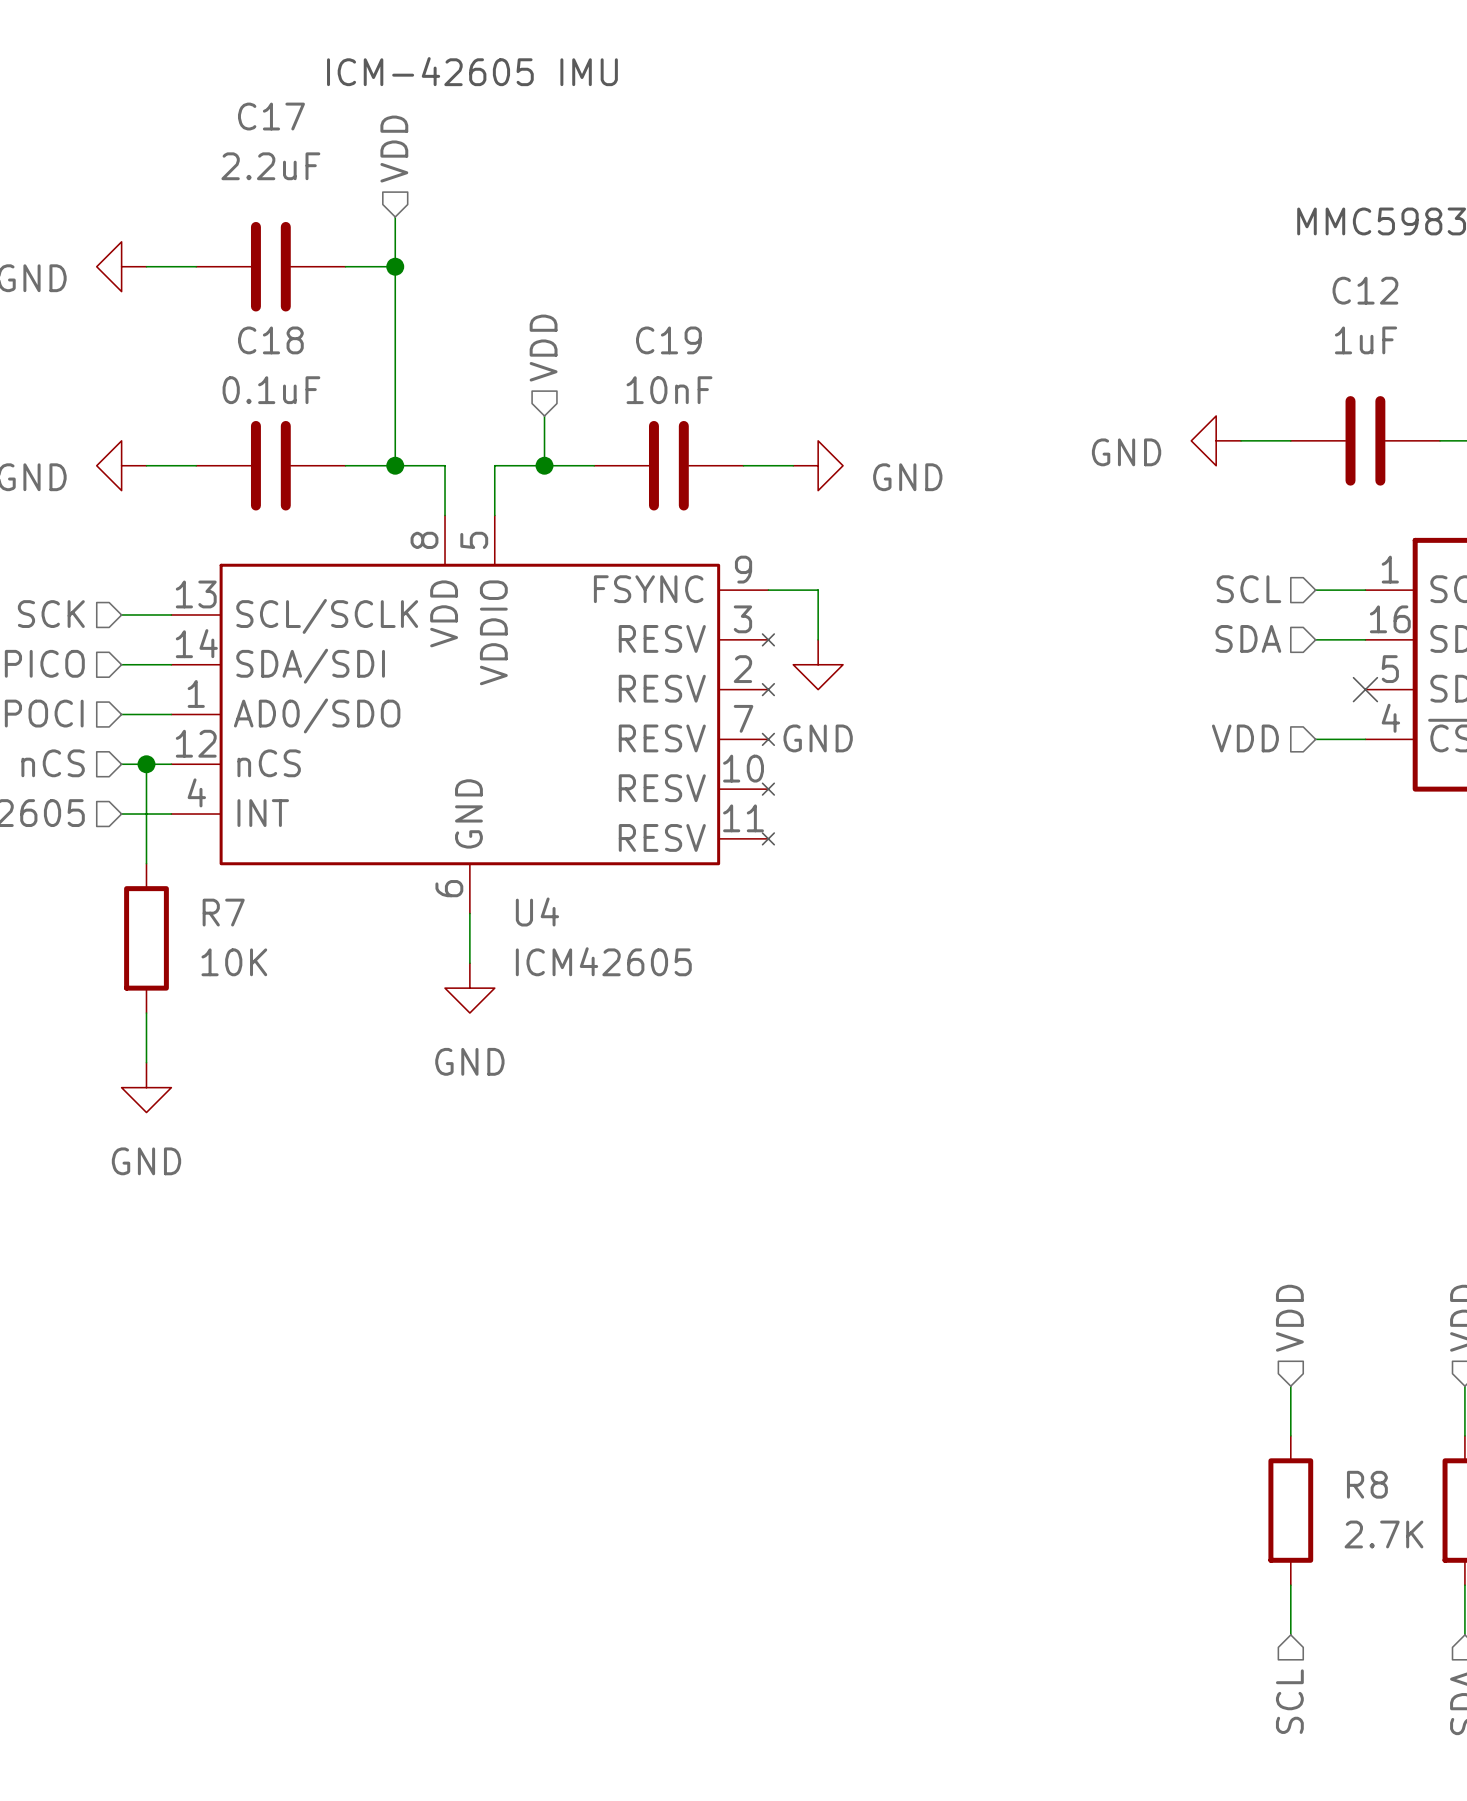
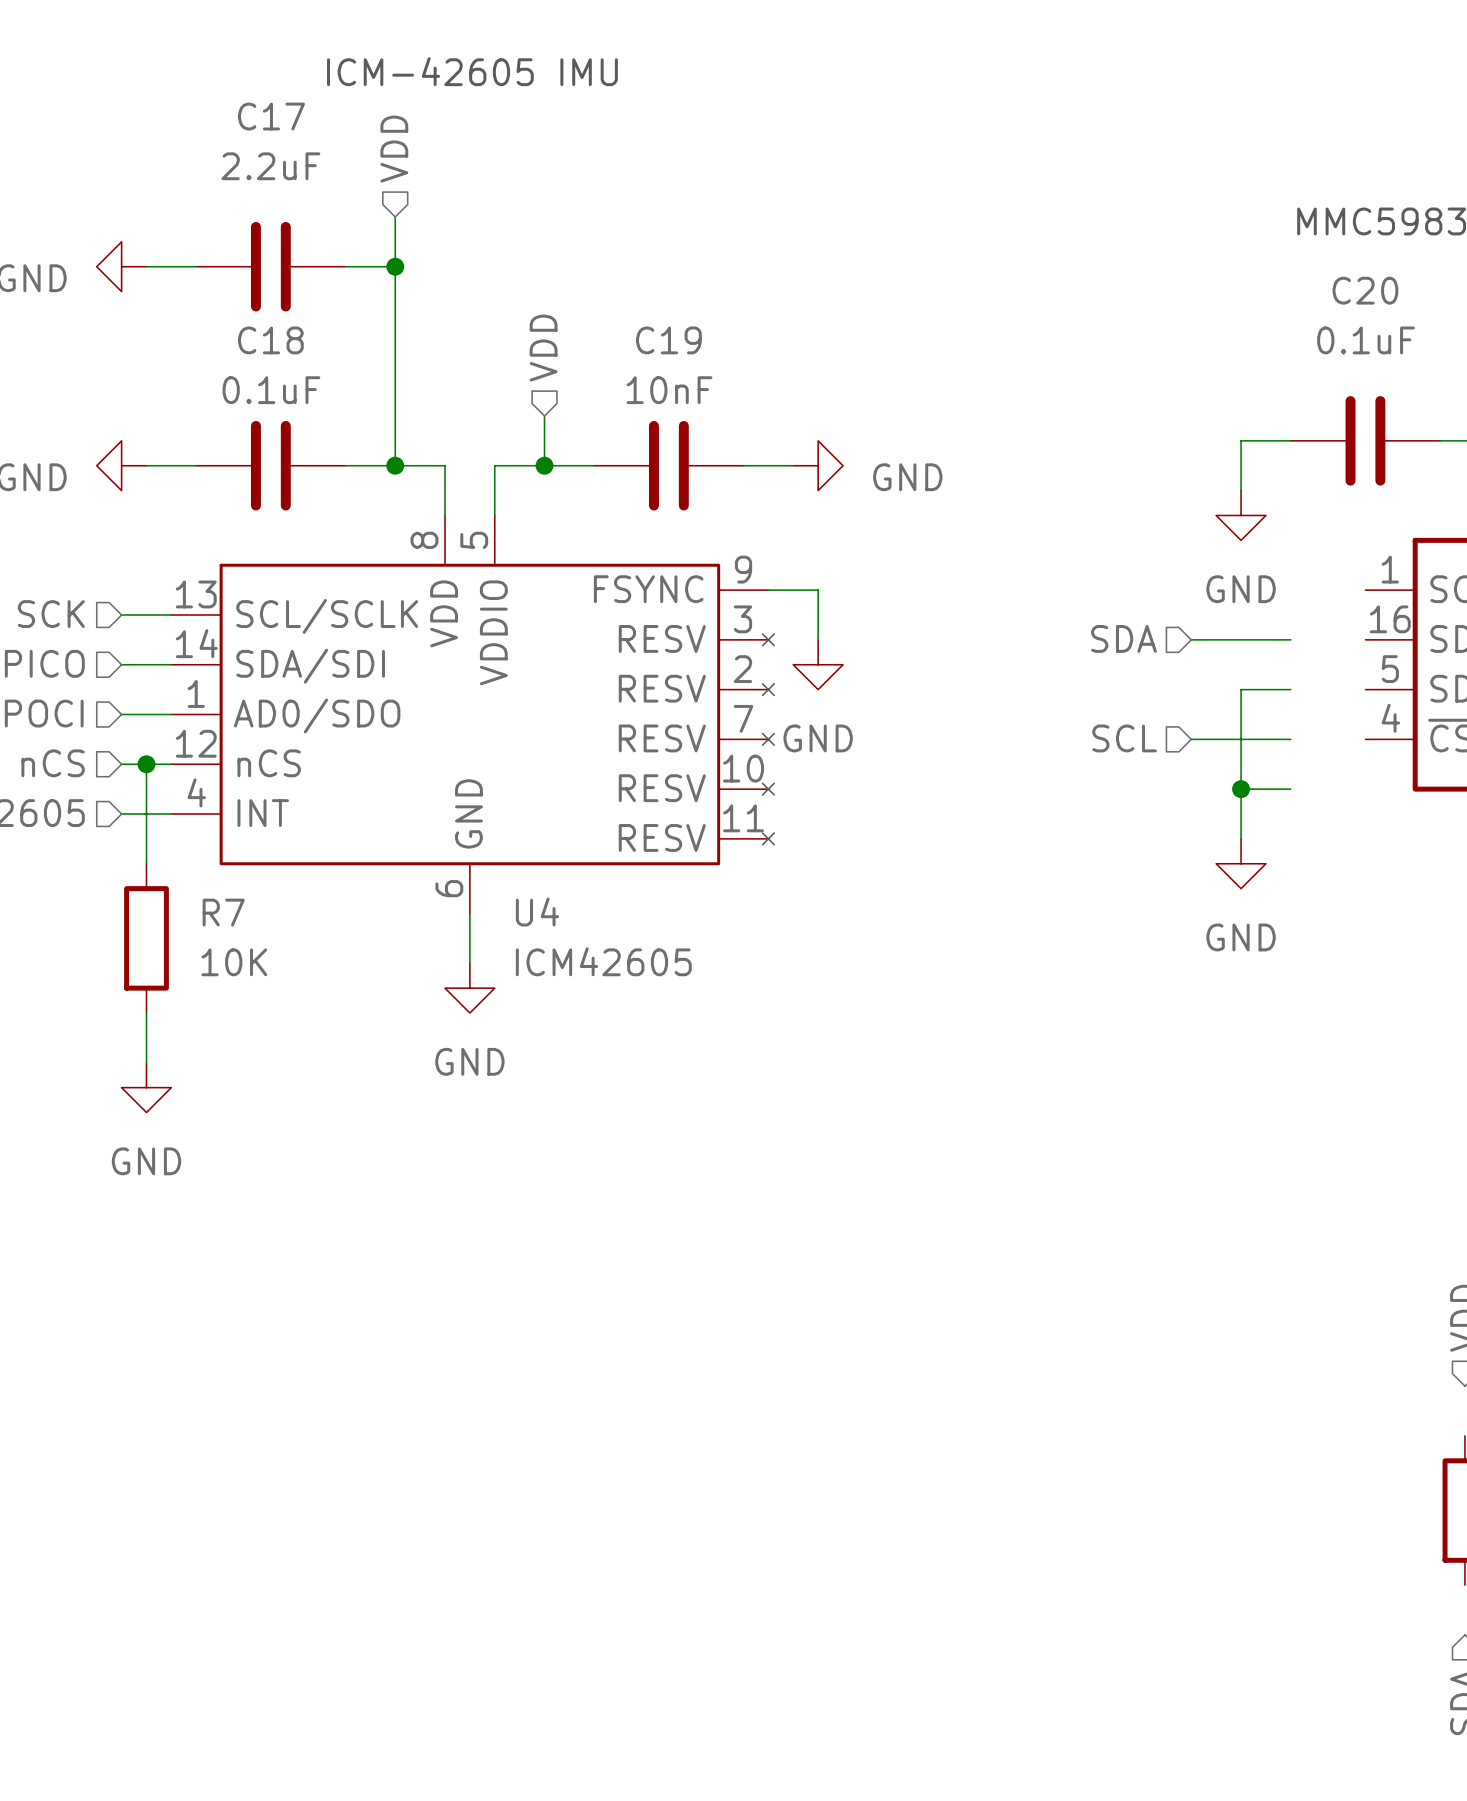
C12 name: C12 (1365, 290) -> C20 (1365, 290)
C12 value: 1uF (1366, 340) -> 0.1uF (1366, 340)
power symbol rotation: 0° (1216, 440) -> 90° counterclockwise (1241, 515)
power symbol position: GND (1216, 440) -> GND (1241, 515)
wire: none -> (1241, 440) (1241, 490)
hierarchical label position: SCL (1248, 589) -> SCL (1124, 738)
wire: (1315, 590) (1365, 590) -> none
hierarchical label position: SDA (1248, 638) -> SDA (1123, 638)
wire: none -> (1191, 639) (1290, 639)
wire: (1315, 639) (1365, 639) -> none
wire: none -> (1290, 689) (1241, 689) (1241, 838)
no-connect mark: (1365, 689) -> none
hierarchical label: VDD (1245, 738) -> none
wire: none -> (1191, 739) (1290, 739)
wire: (1315, 739) (1365, 739) -> (1241, 789) (1290, 789)
junction: none -> (1241, 789)
power symbol: none -> GND (1241, 863)
hierarchical label: VDD (1289, 1318) -> none
wire: (1290, 1386) (1290, 1435) -> none
wire: (1464, 1386) (1464, 1435) -> none
R8: 2.7K (1290, 1510) -> none
wire: (1290, 1585) (1290, 1634) -> none
wire: (1464, 1585) (1464, 1634) -> none
hierarchical label: SCL (1289, 1701) -> none

